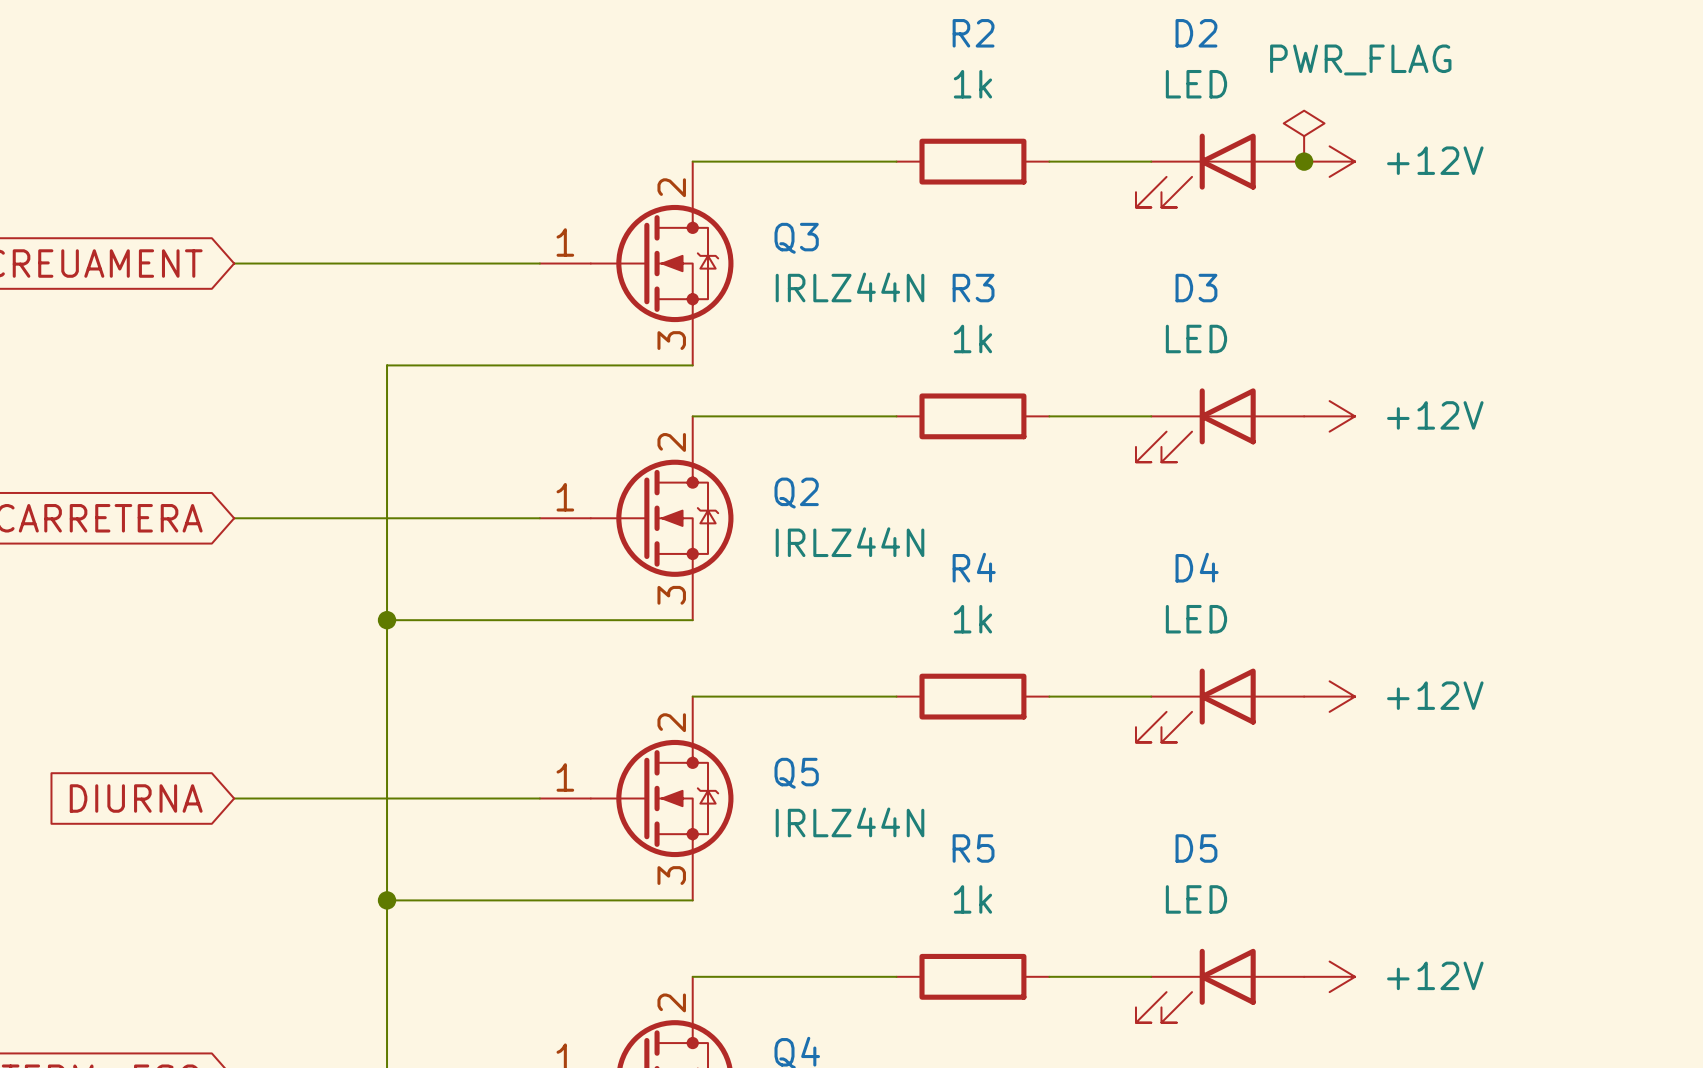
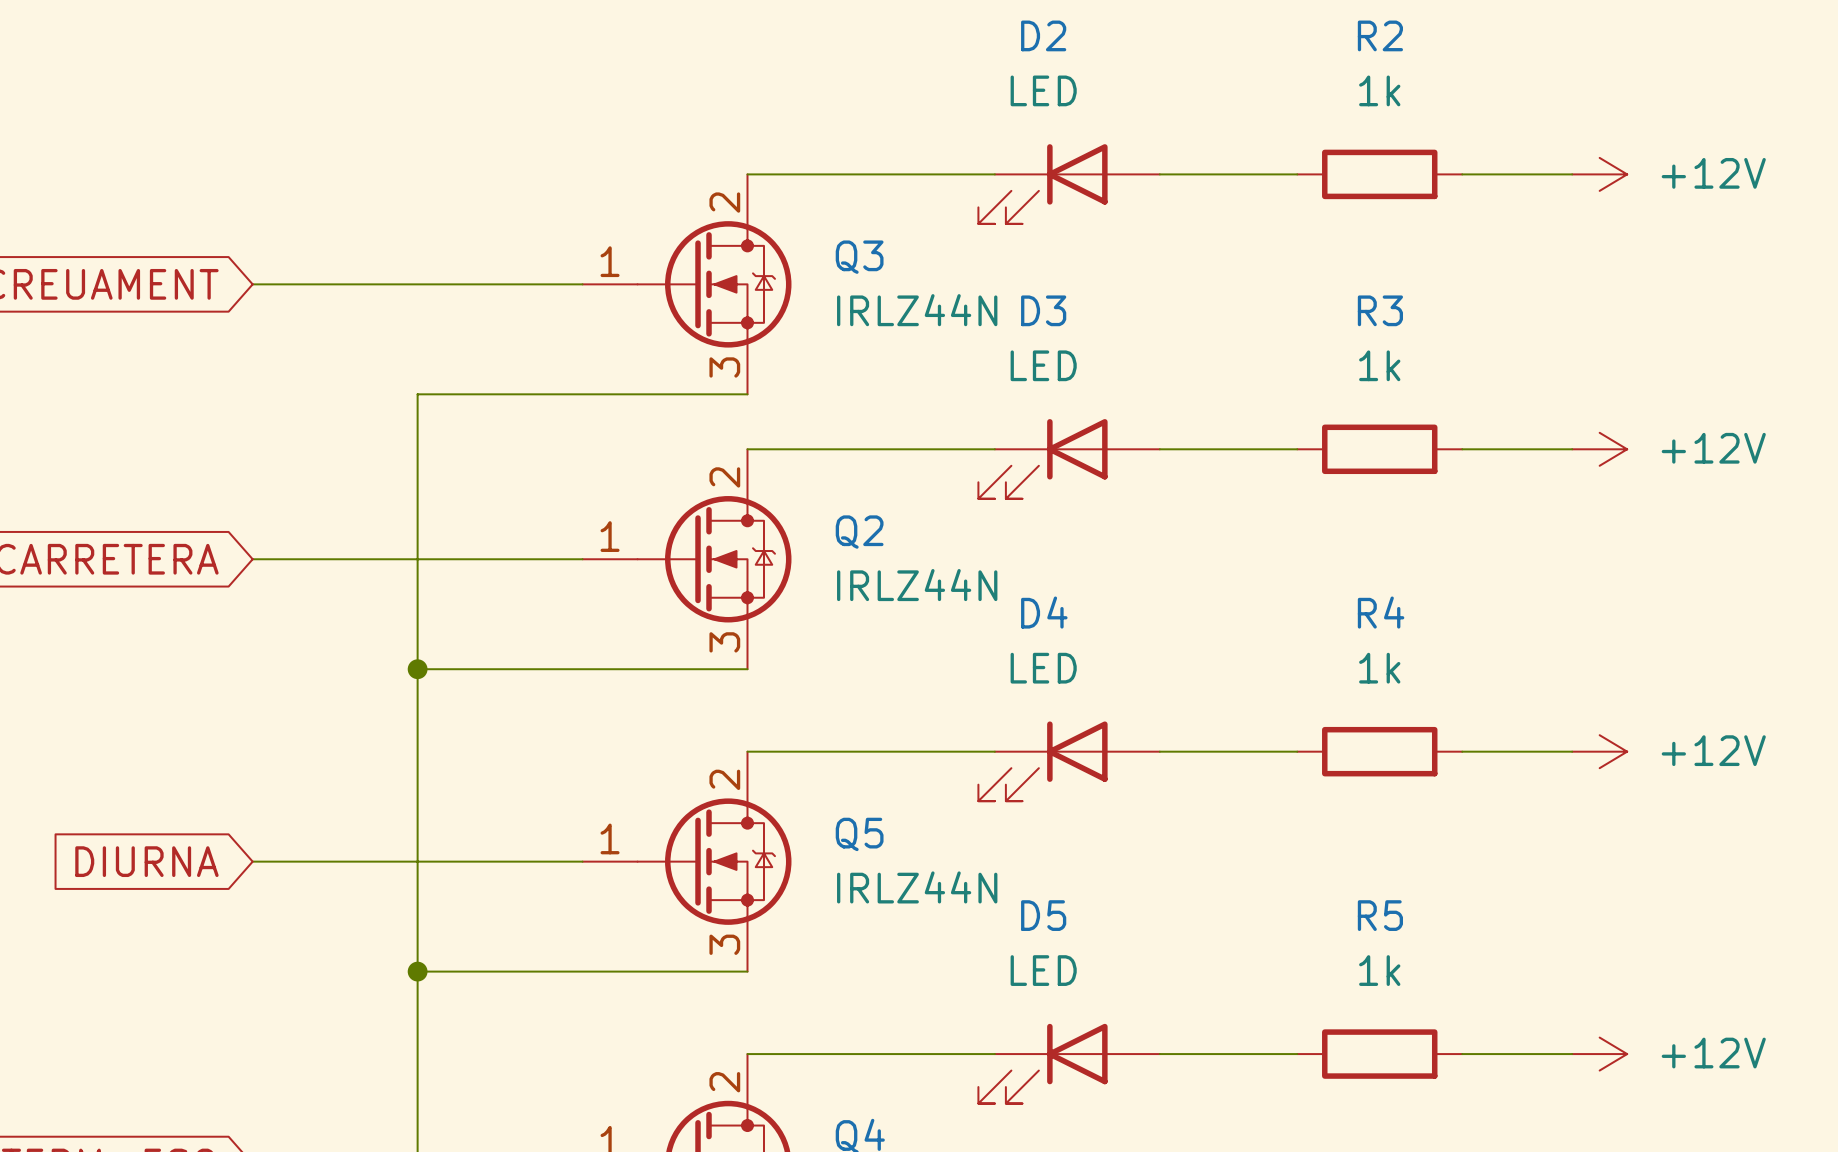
power symbol: PWR_FLAG (1304, 136) -> none
R2 position: (972, 161) -> (1379, 174)
junction: (1304, 161) -> none
power symbol: +12V (1329, 161) -> none
wire: none -> (1462, 174) (1572, 174)
power symbol: none -> +12V (1599, 174)
D2 position: (1220, 170) -> (1069, 184)
R3 position: (972, 416) -> (1379, 449)
power symbol: +12V (1329, 416) -> none
wire: none -> (1462, 449) (1572, 449)
power symbol: none -> +12V (1599, 449)
D3 position: (1220, 425) -> (1069, 458)
R4 position: (972, 696) -> (1379, 751)
power symbol position: +12V (1329, 696) -> +12V (1599, 751)
wire: none -> (1462, 751) (1572, 751)
D4 position: (1220, 705) -> (1069, 761)
R5 position: (972, 976) -> (1379, 1054)
power symbol position: +12V (1329, 976) -> +12V (1599, 1054)
wire: none -> (1462, 1054) (1572, 1054)
D5 position: (1220, 985) -> (1069, 1063)

